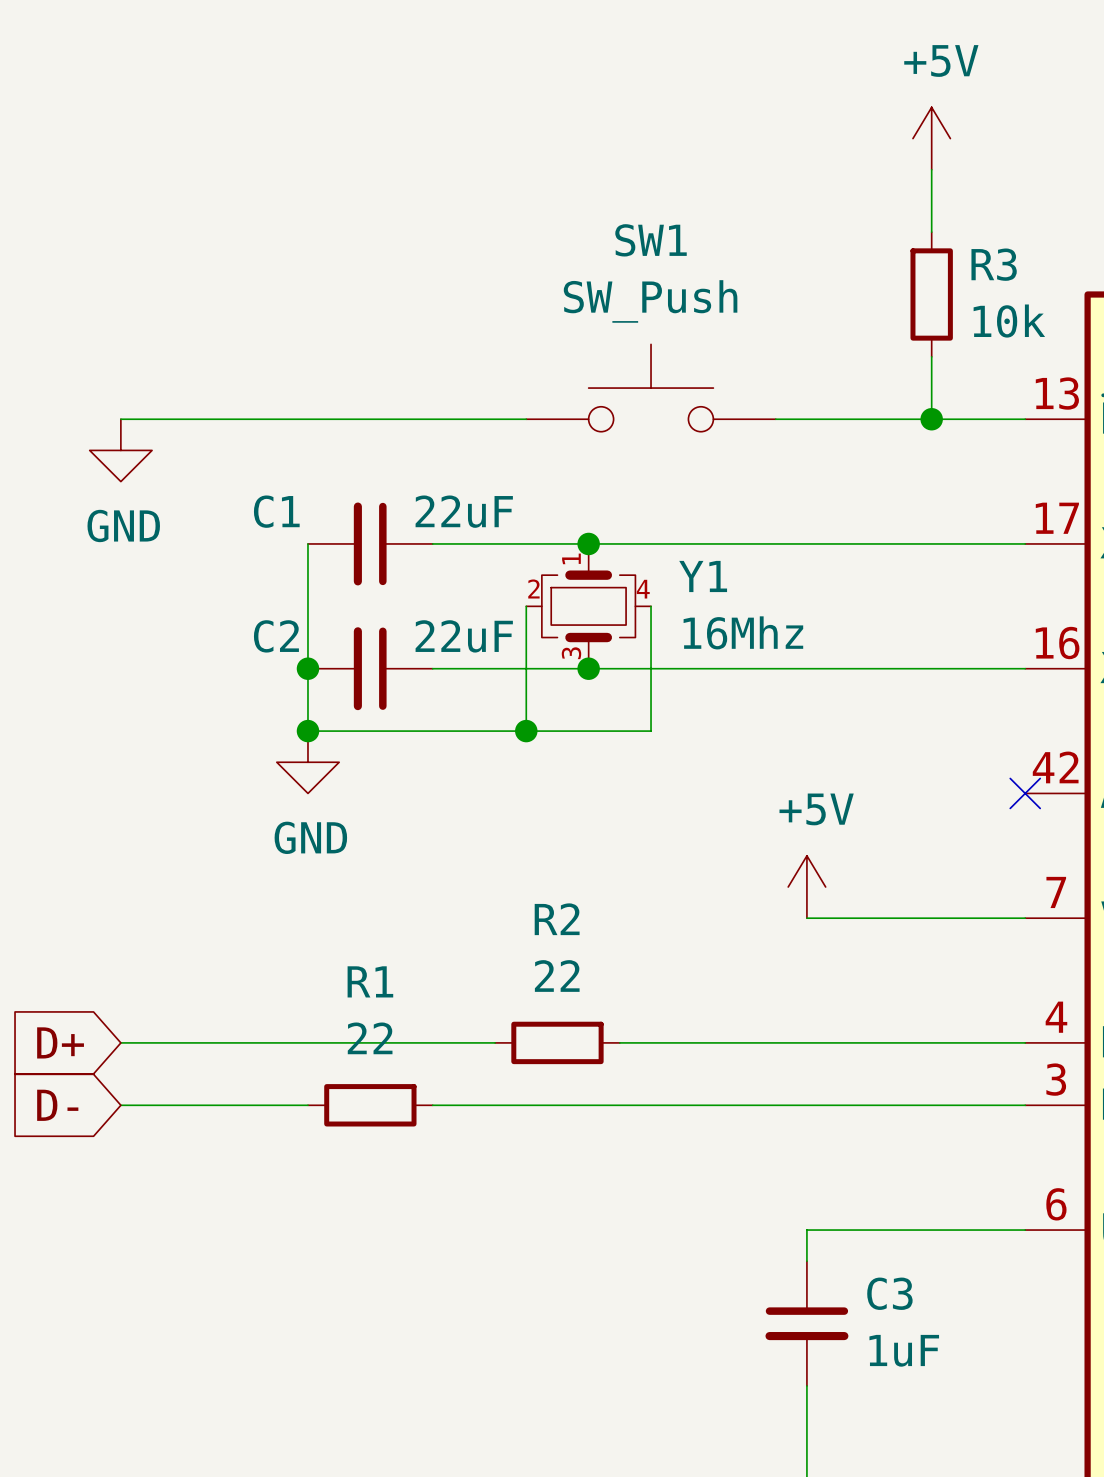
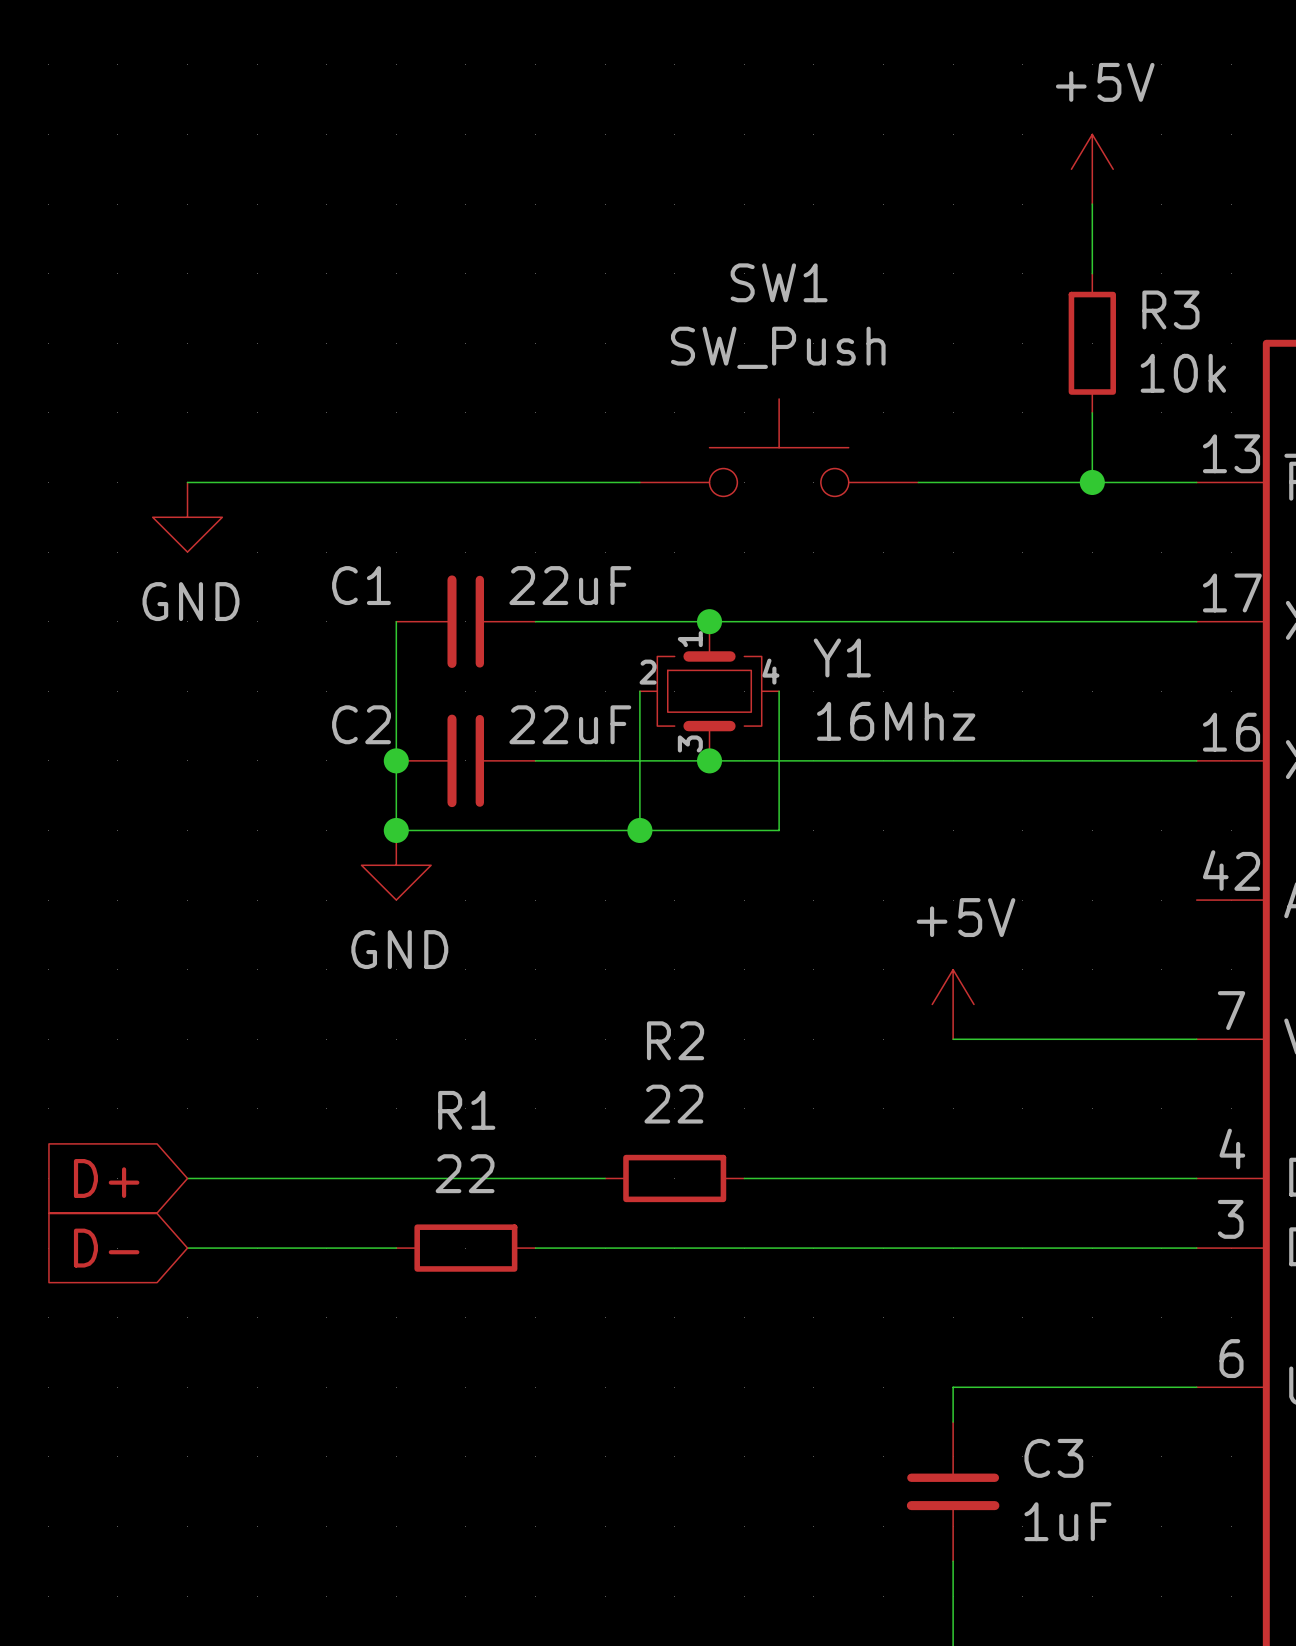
no-connect mark: (1025, 793) -> none

